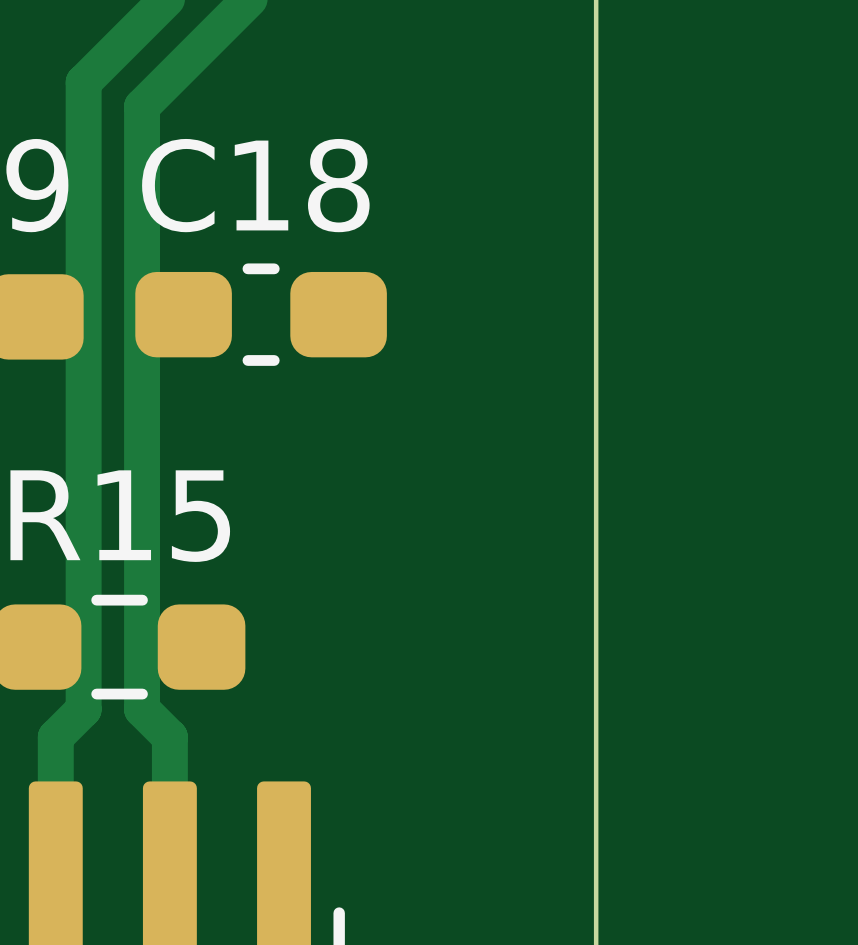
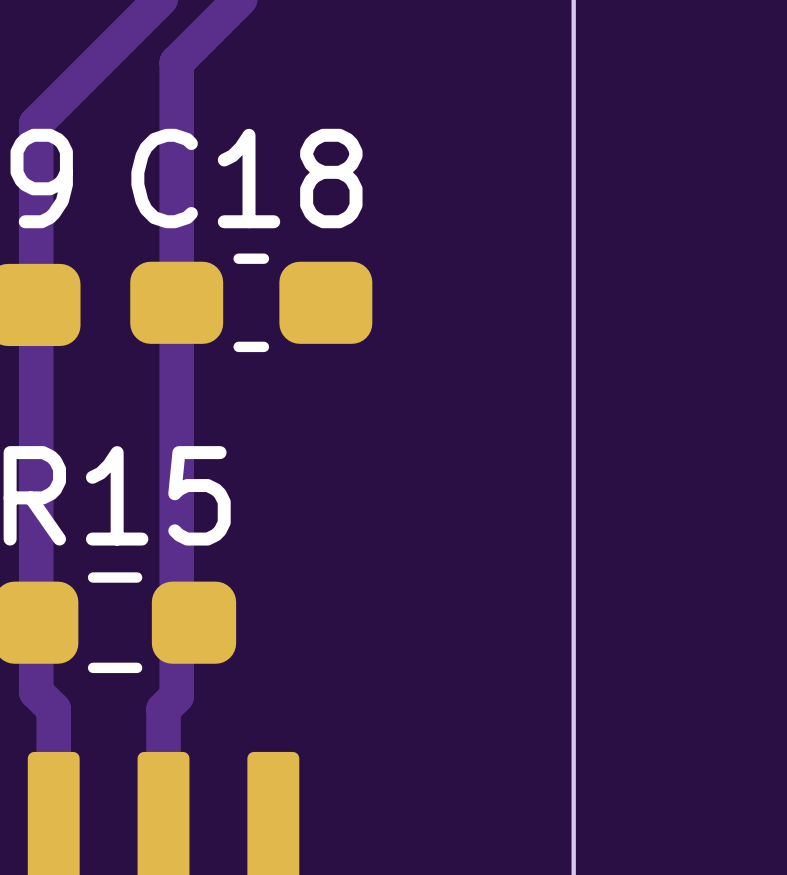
track: (183, 65) (142, 106) (142, 709) (169, 737) -> (176, 62) (176, 696) (163, 709)
track: (83, 82) (83, 709) (55, 737) -> (80, 79) (36, 123) (36, 691) (53, 709)

